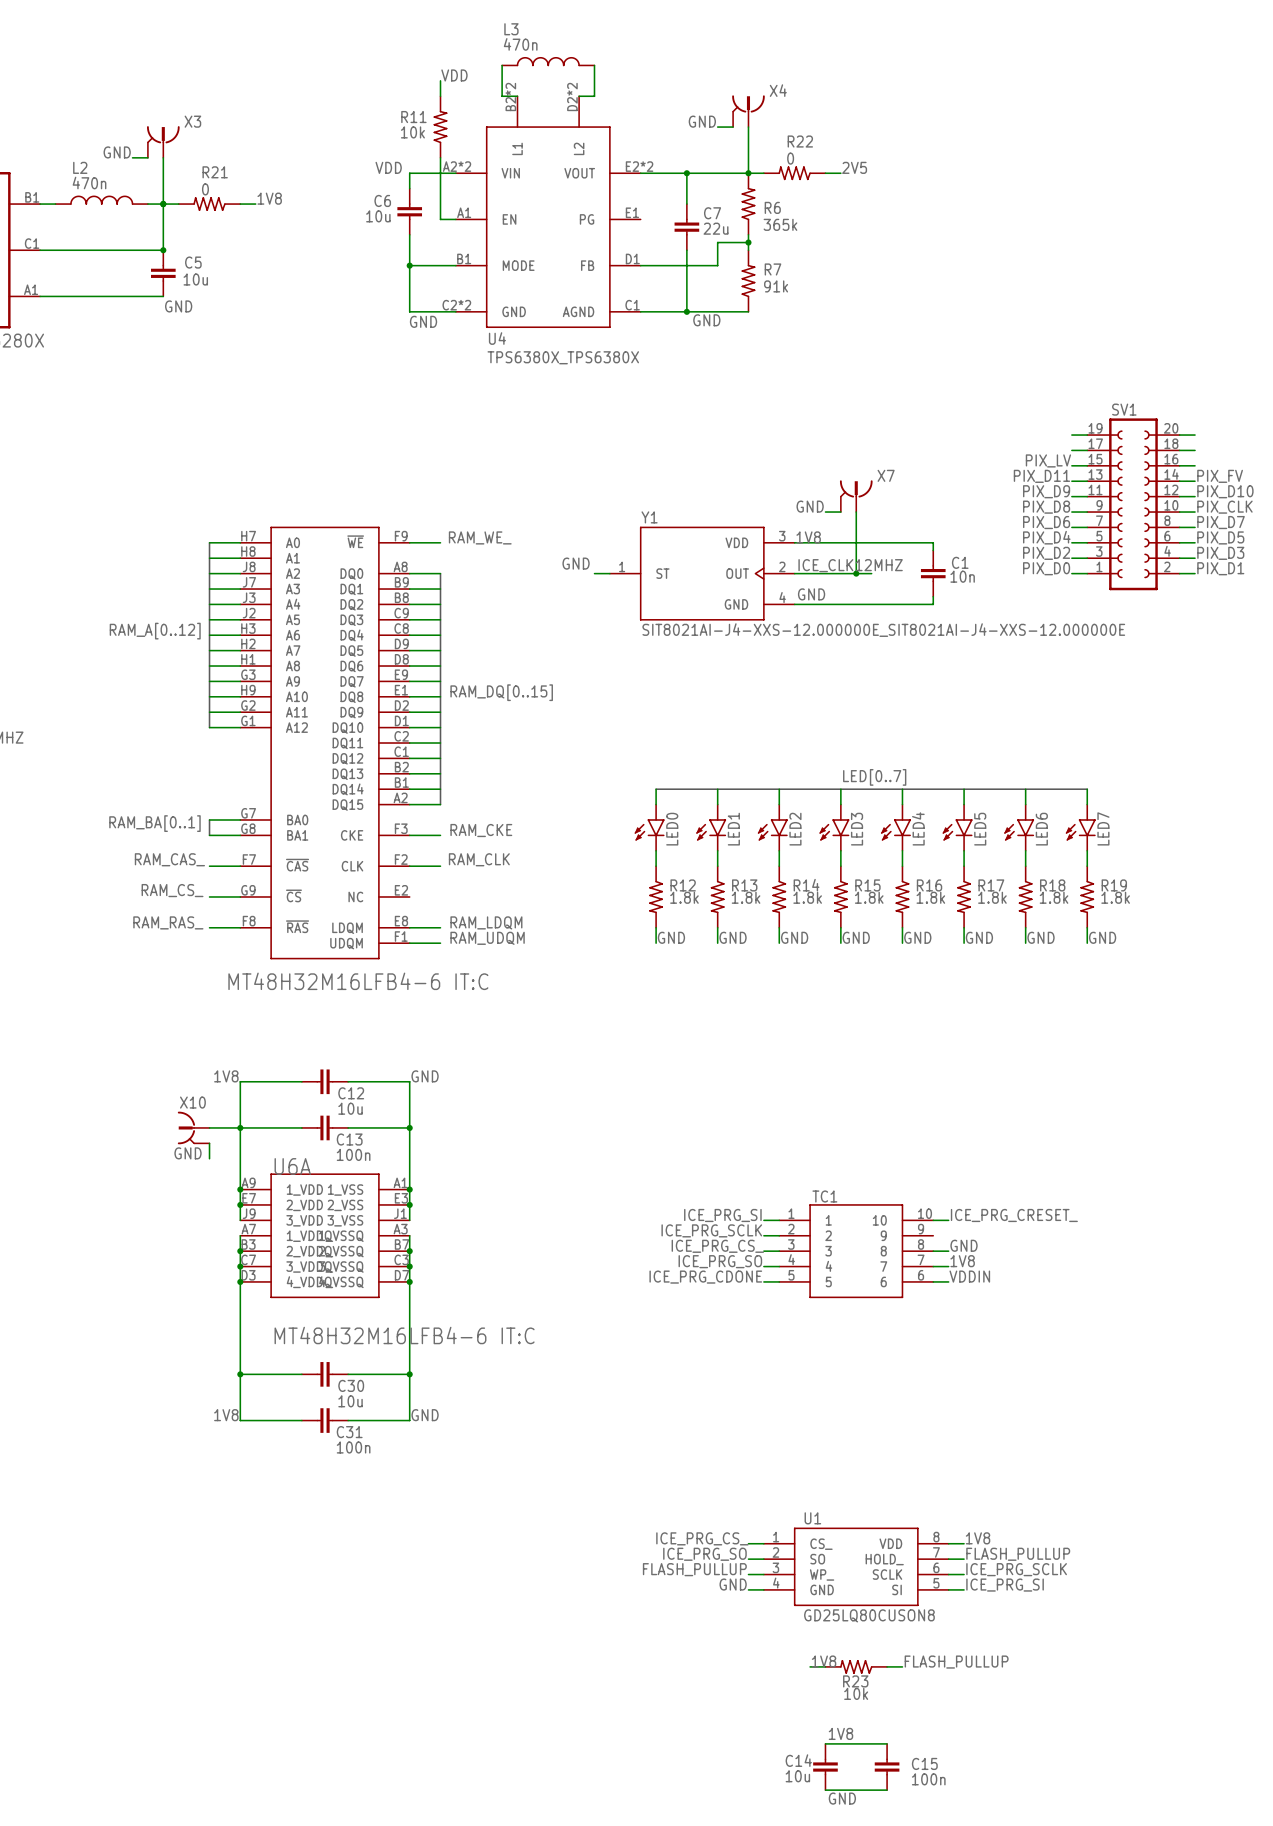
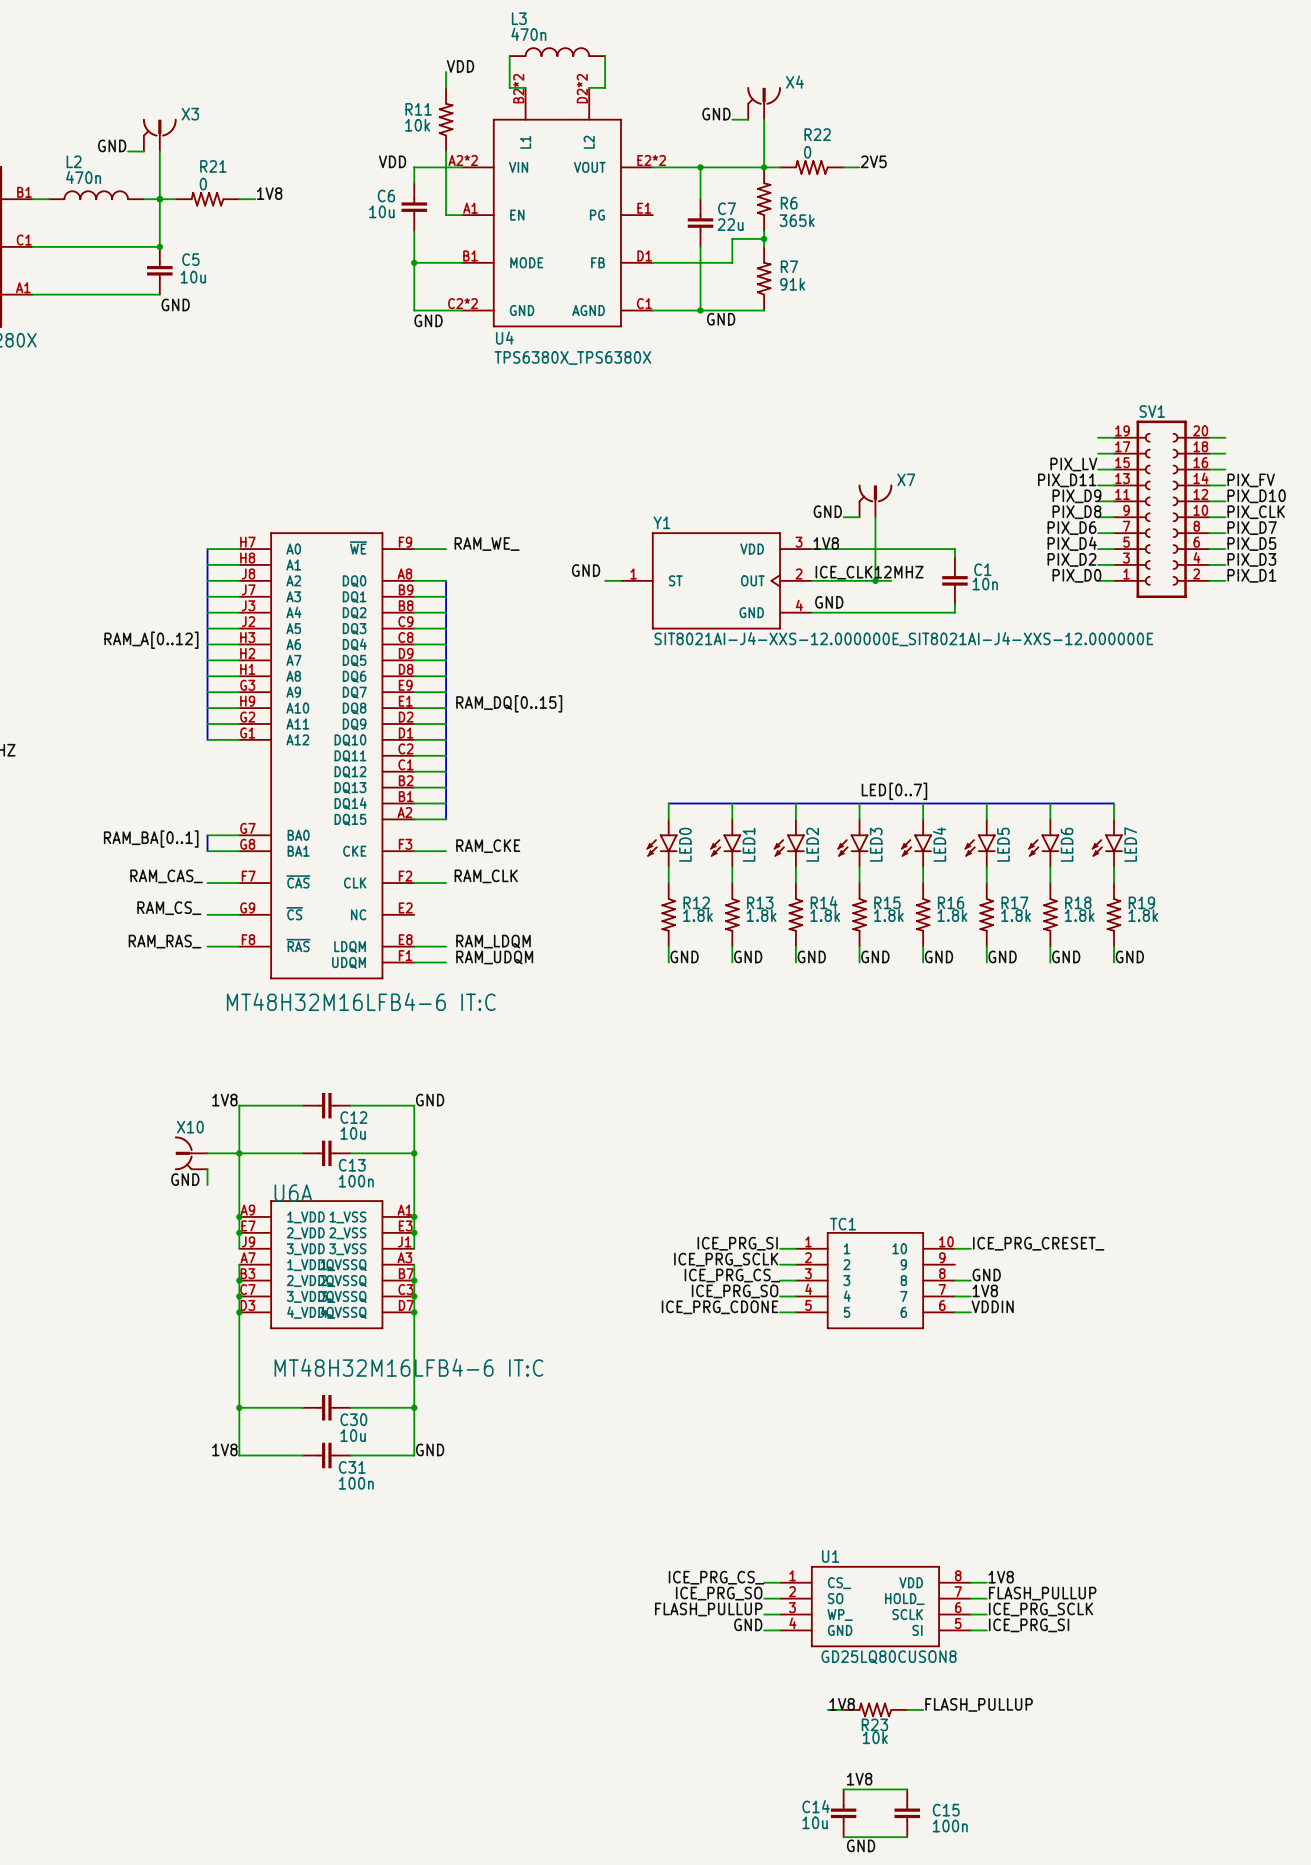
label position: PIX_D9 (1046, 491) -> PIX_D9 (1076, 496)
label position: PIX_D8 (1046, 507) -> PIX_D8 (1076, 512)
label position: PIX_D0 (1046, 568) -> PIX_D0 (1076, 575)

